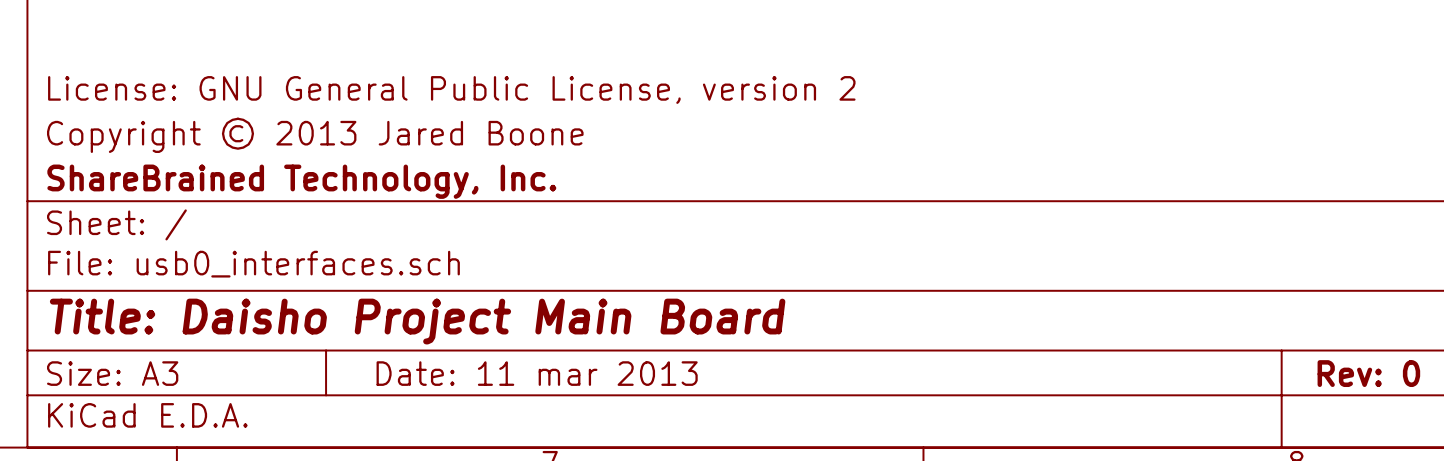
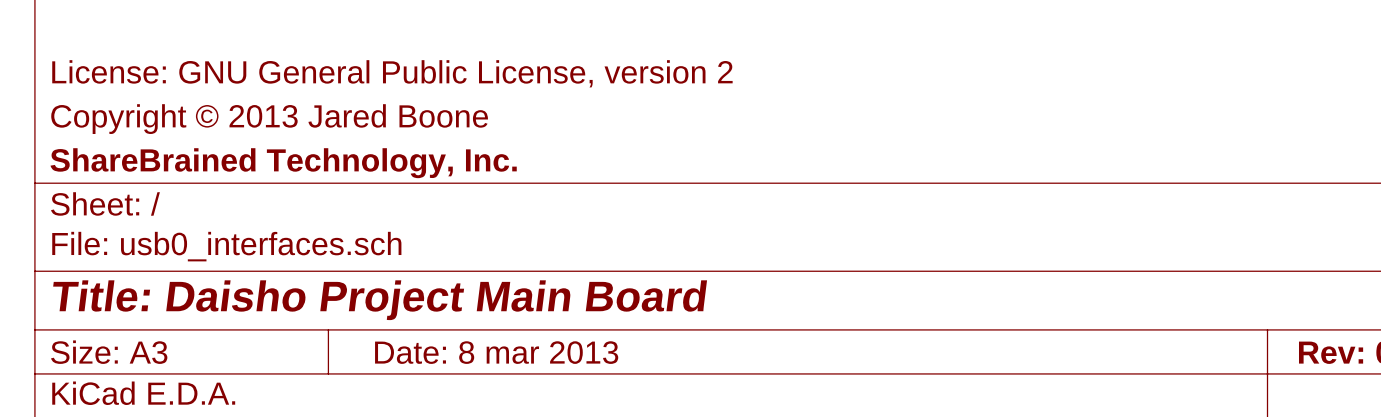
title block: Date: 11 mar 2013 (537, 373) -> Date: 8 mar 2013 (496, 352)

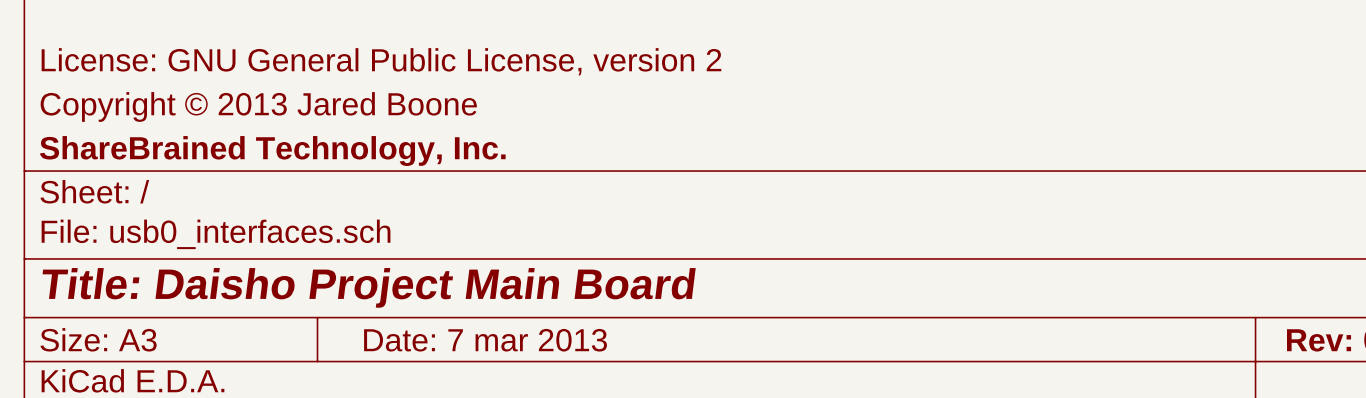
title block: Date: 8 mar 2013 (496, 352) -> Date: 7 mar 2013 (485, 340)

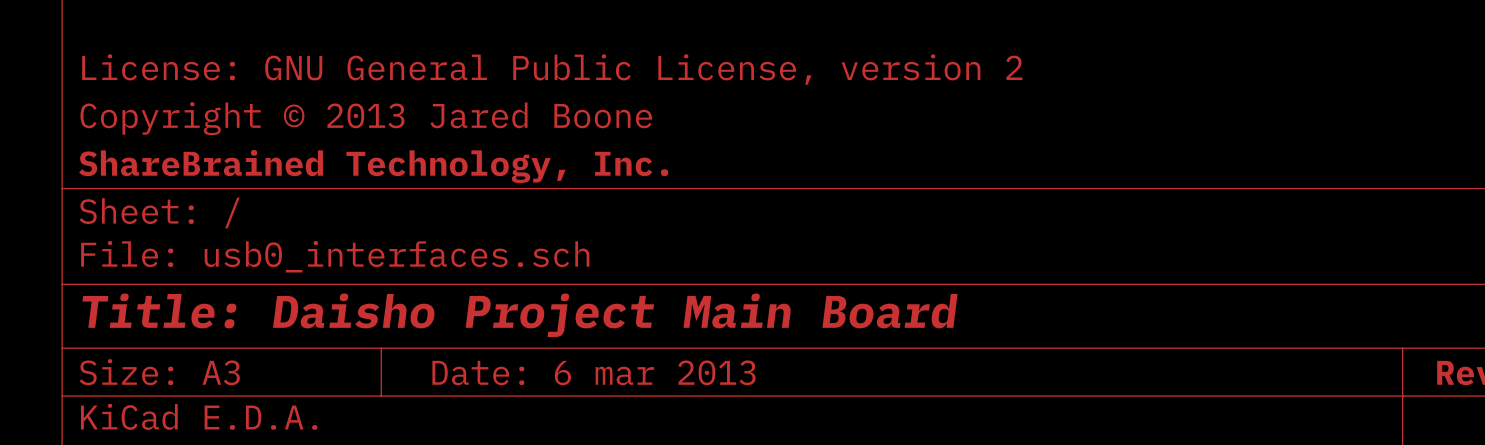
title block: Date: 7 mar 2013 (485, 340) -> Date: 6 mar 2013 (594, 372)

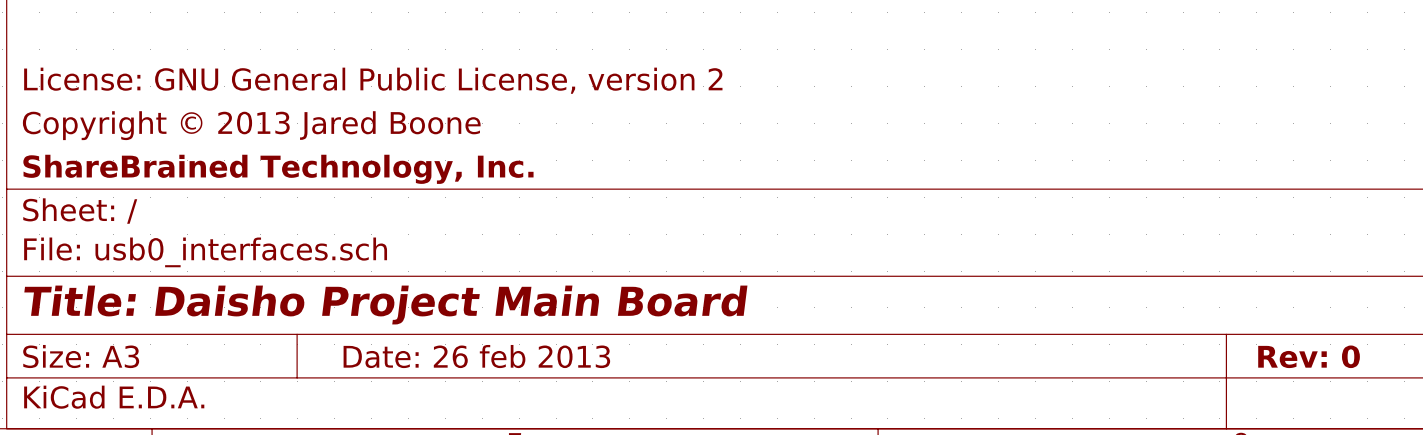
title block: Date: 6 mar 2013 (594, 372) -> Date: 26 feb 2013 (476, 356)

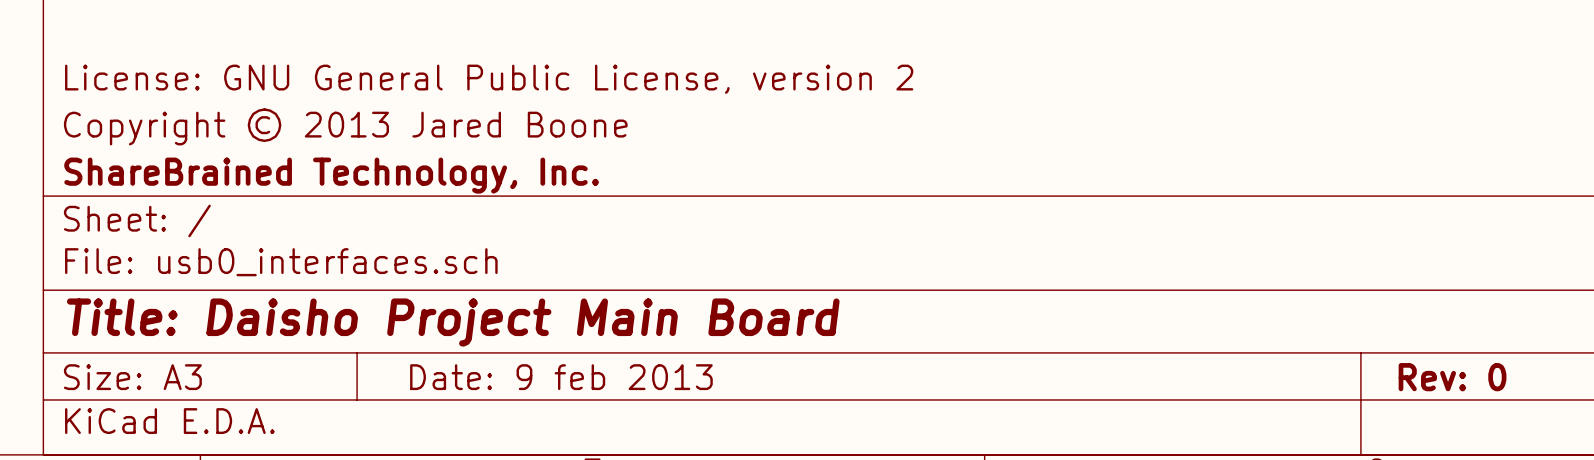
title block: Date: 26 feb 2013 (476, 356) -> Date: 9 feb 2013 (561, 377)

